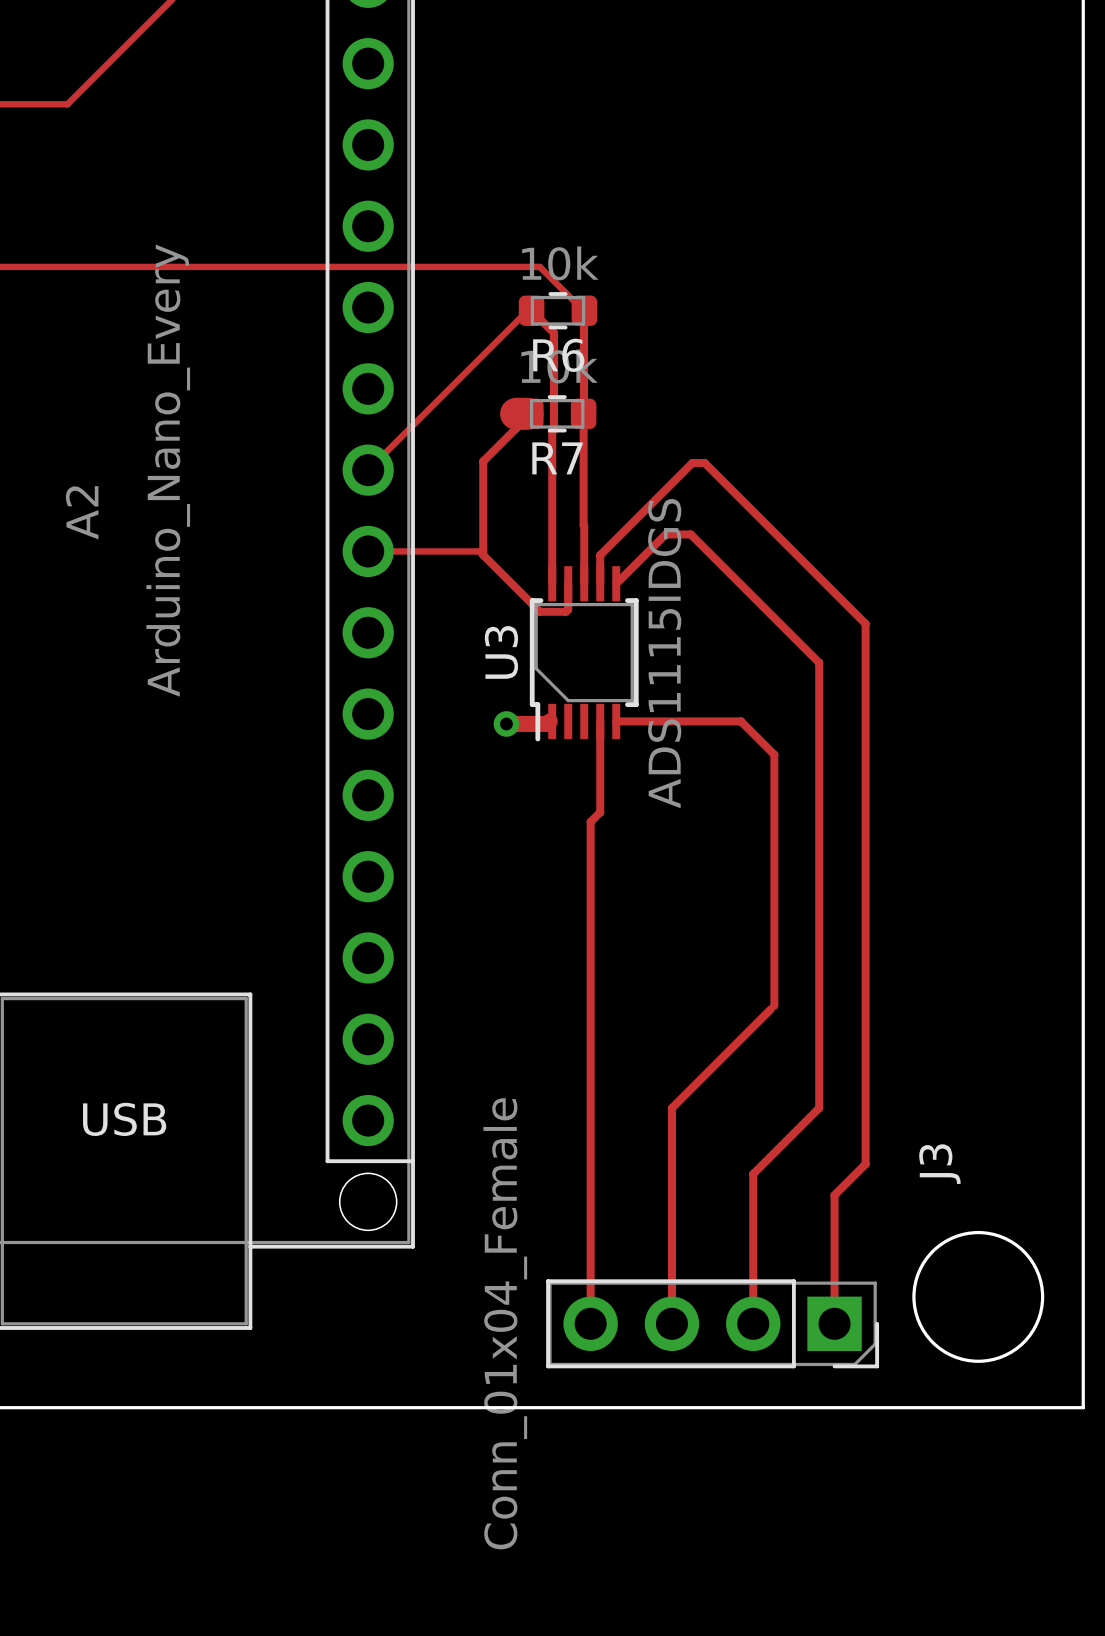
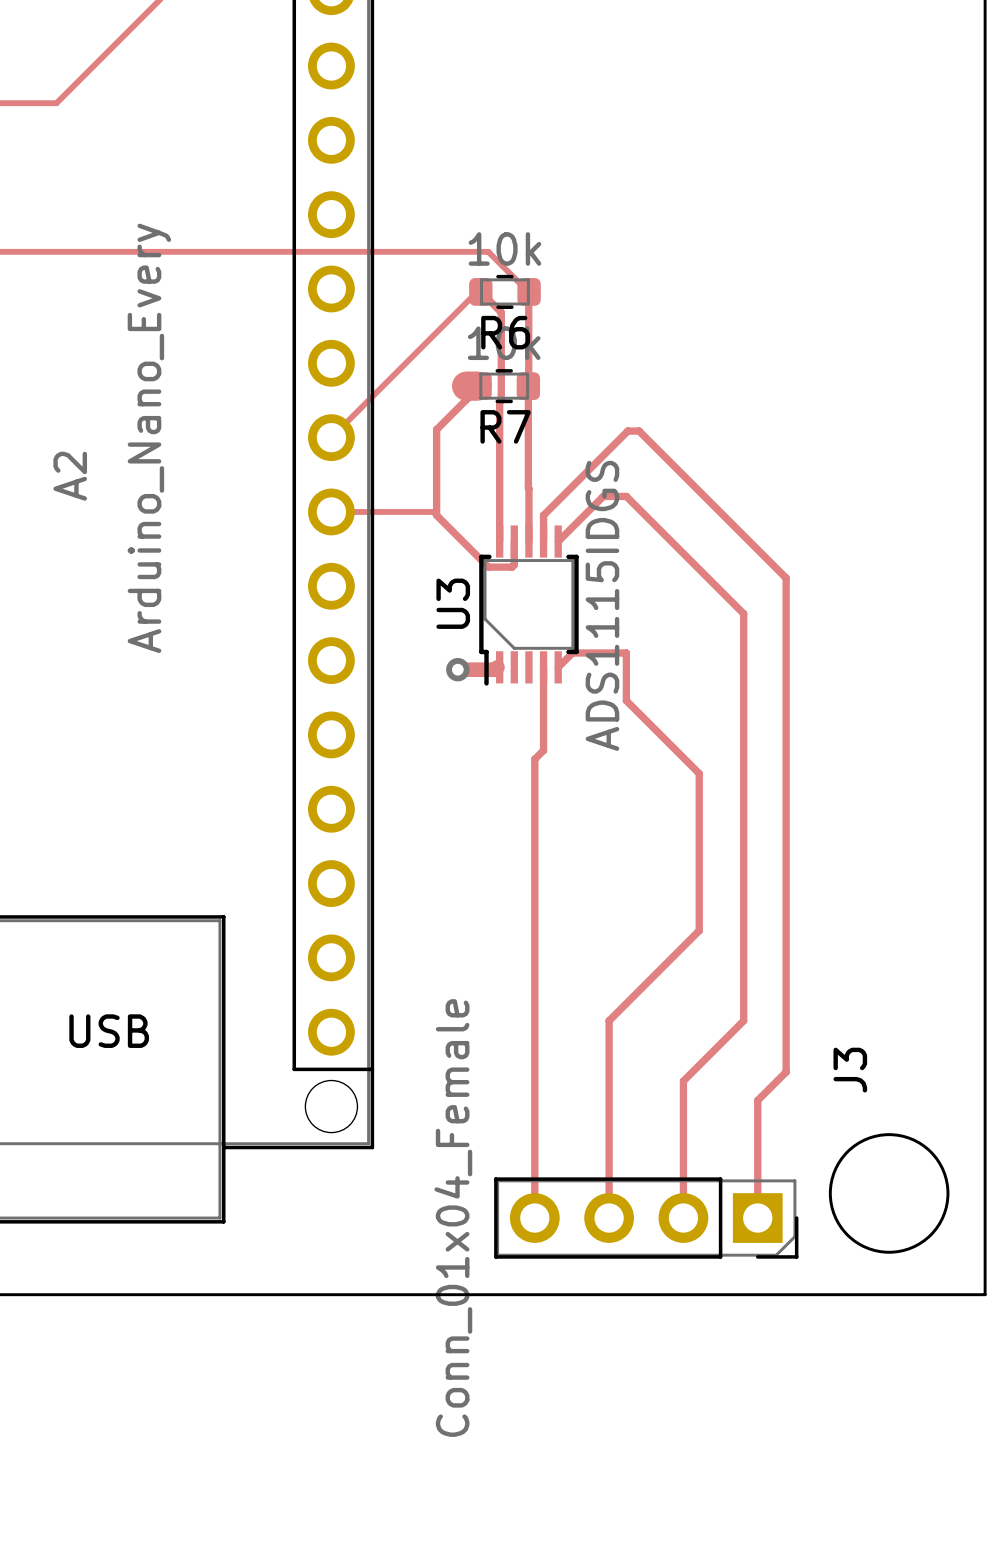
track: (616, 721) (741, 721) (774, 754) (774, 1005) (770, 1009) -> (558, 667) (572, 653) (626, 653) (626, 700) (699, 773) (699, 930)

